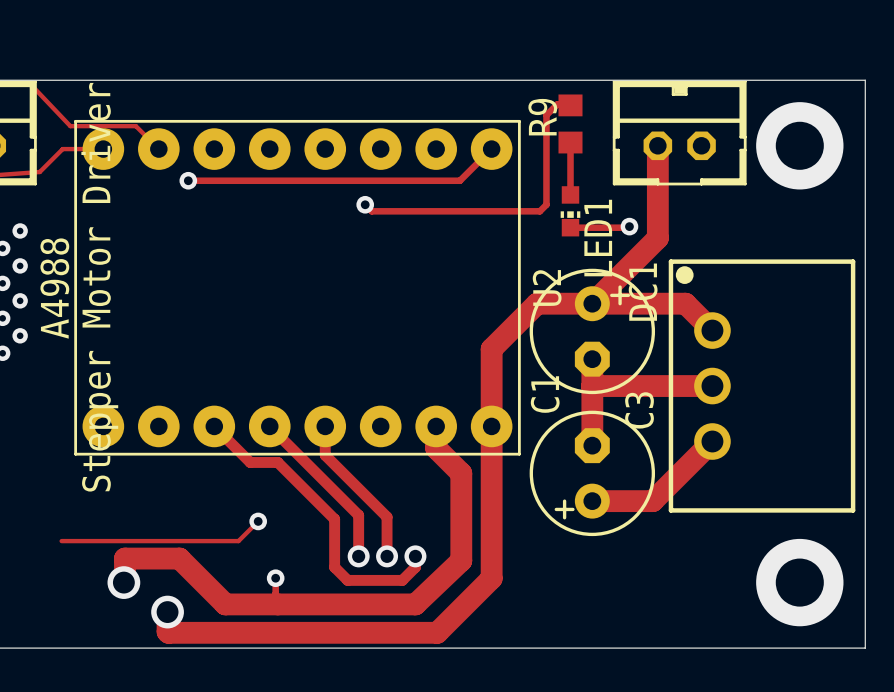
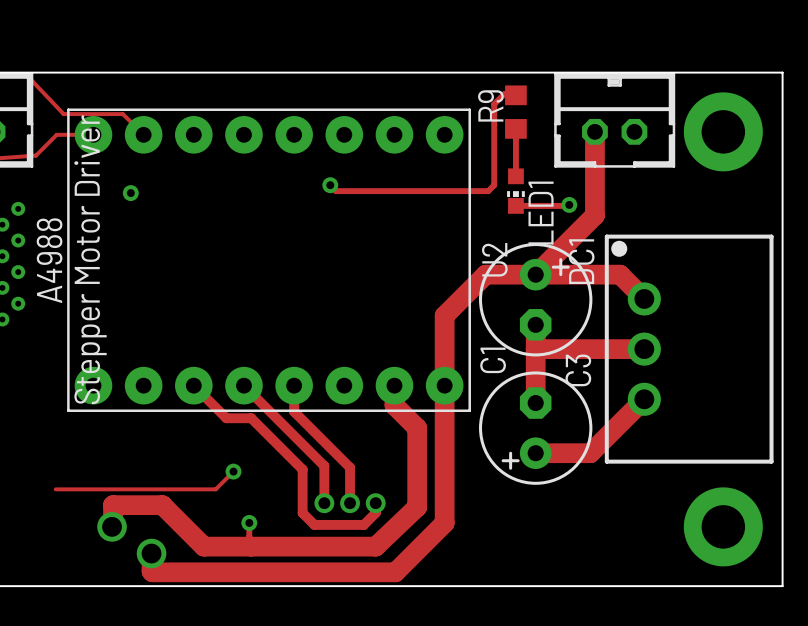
track: (491, 149) (459, 180) (188, 180) -> none
via position: (188, 180) -> (130, 193)

